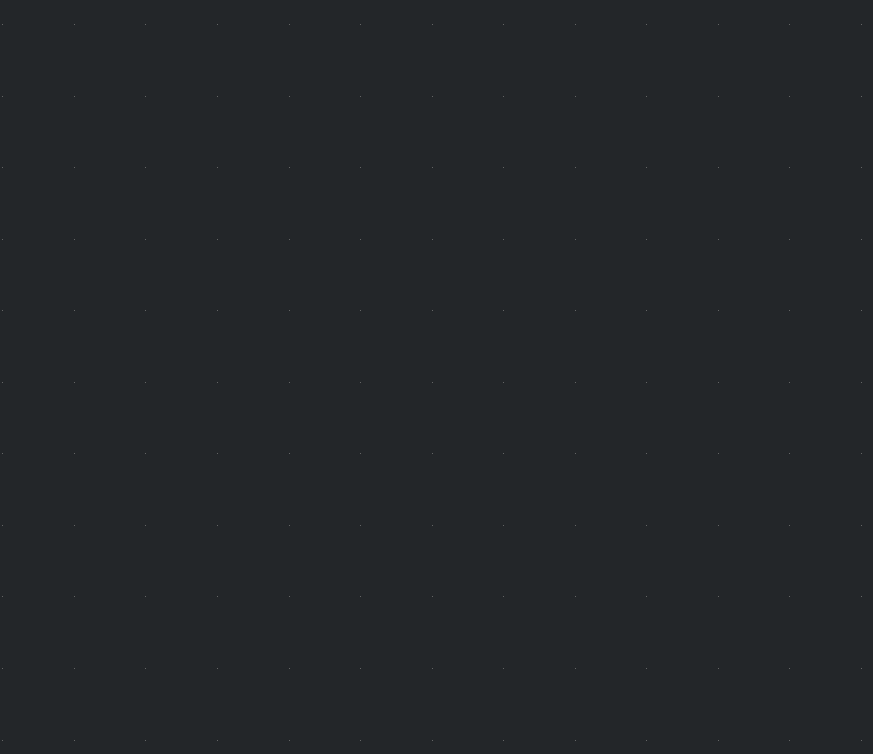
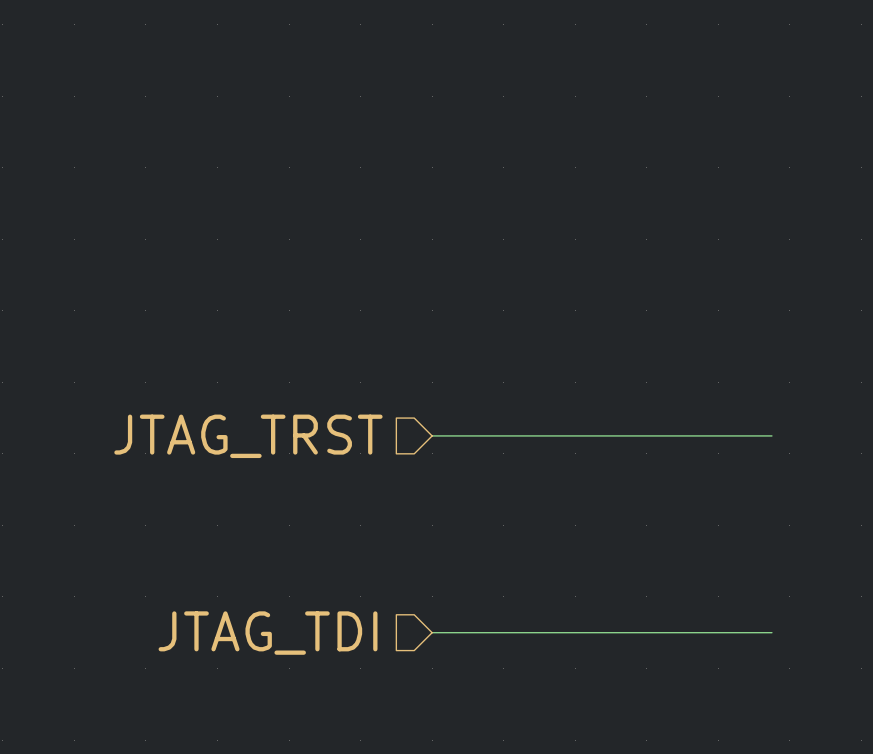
wire: none -> (432, 435) (771, 435)
hierarchical label: none -> JTAG_TRST (248, 436)
wire: none -> (432, 632) (771, 632)
hierarchical label: none -> JTAG_TDI (268, 633)

